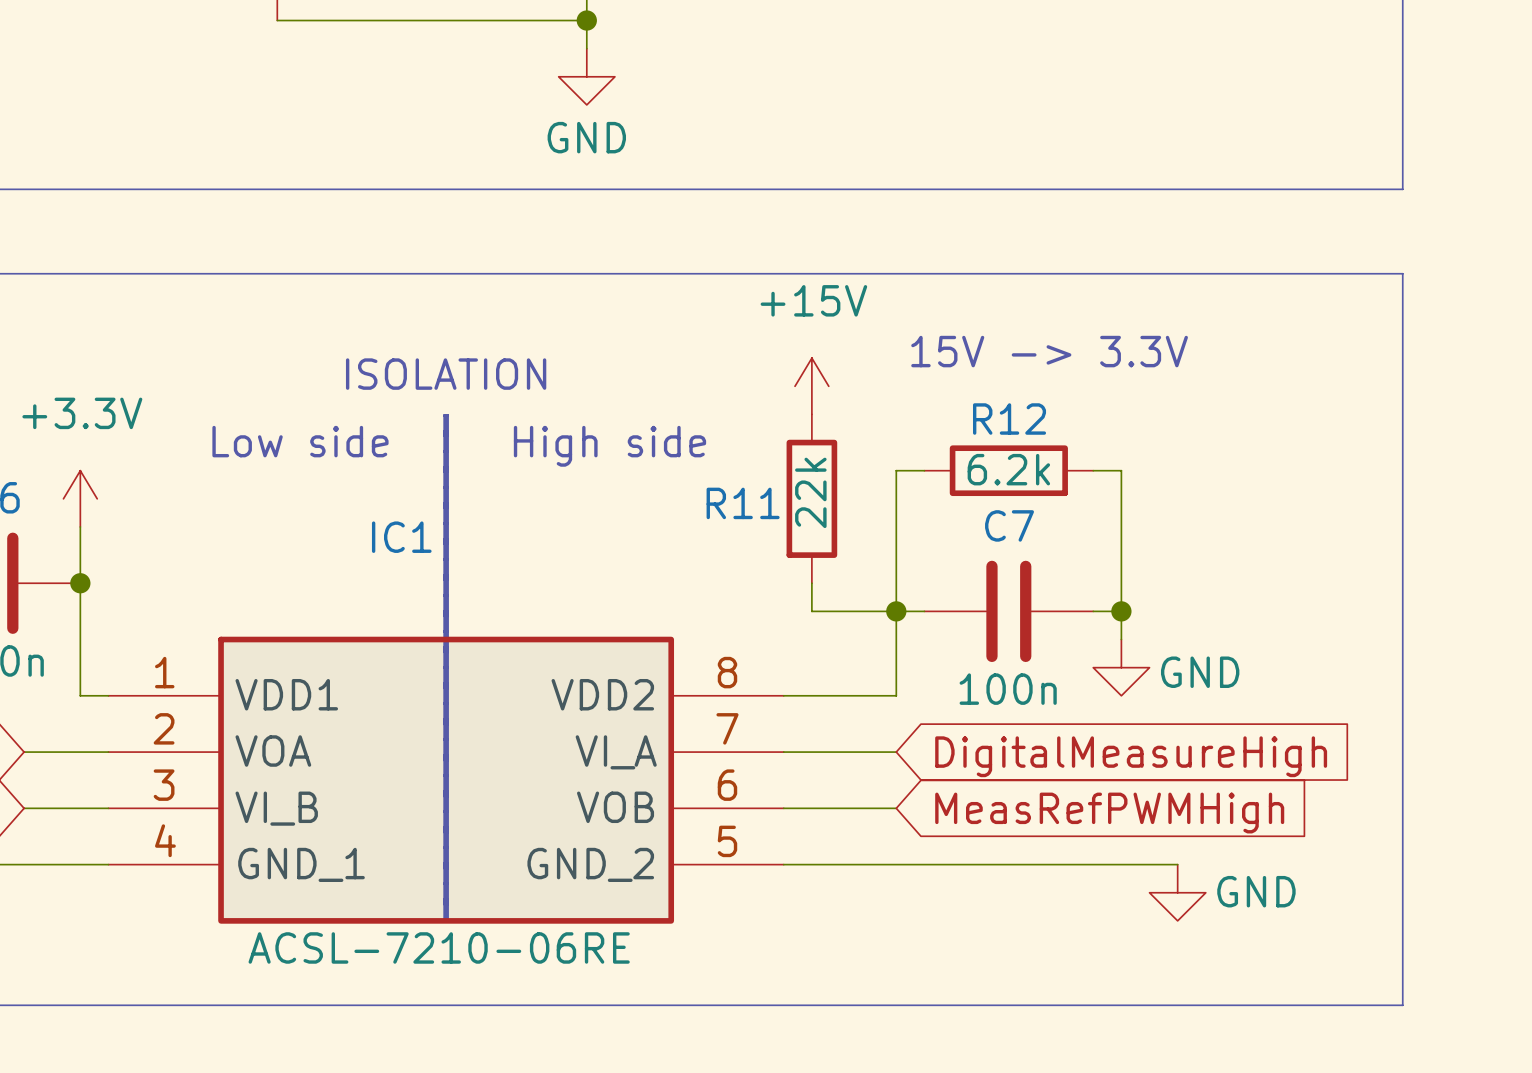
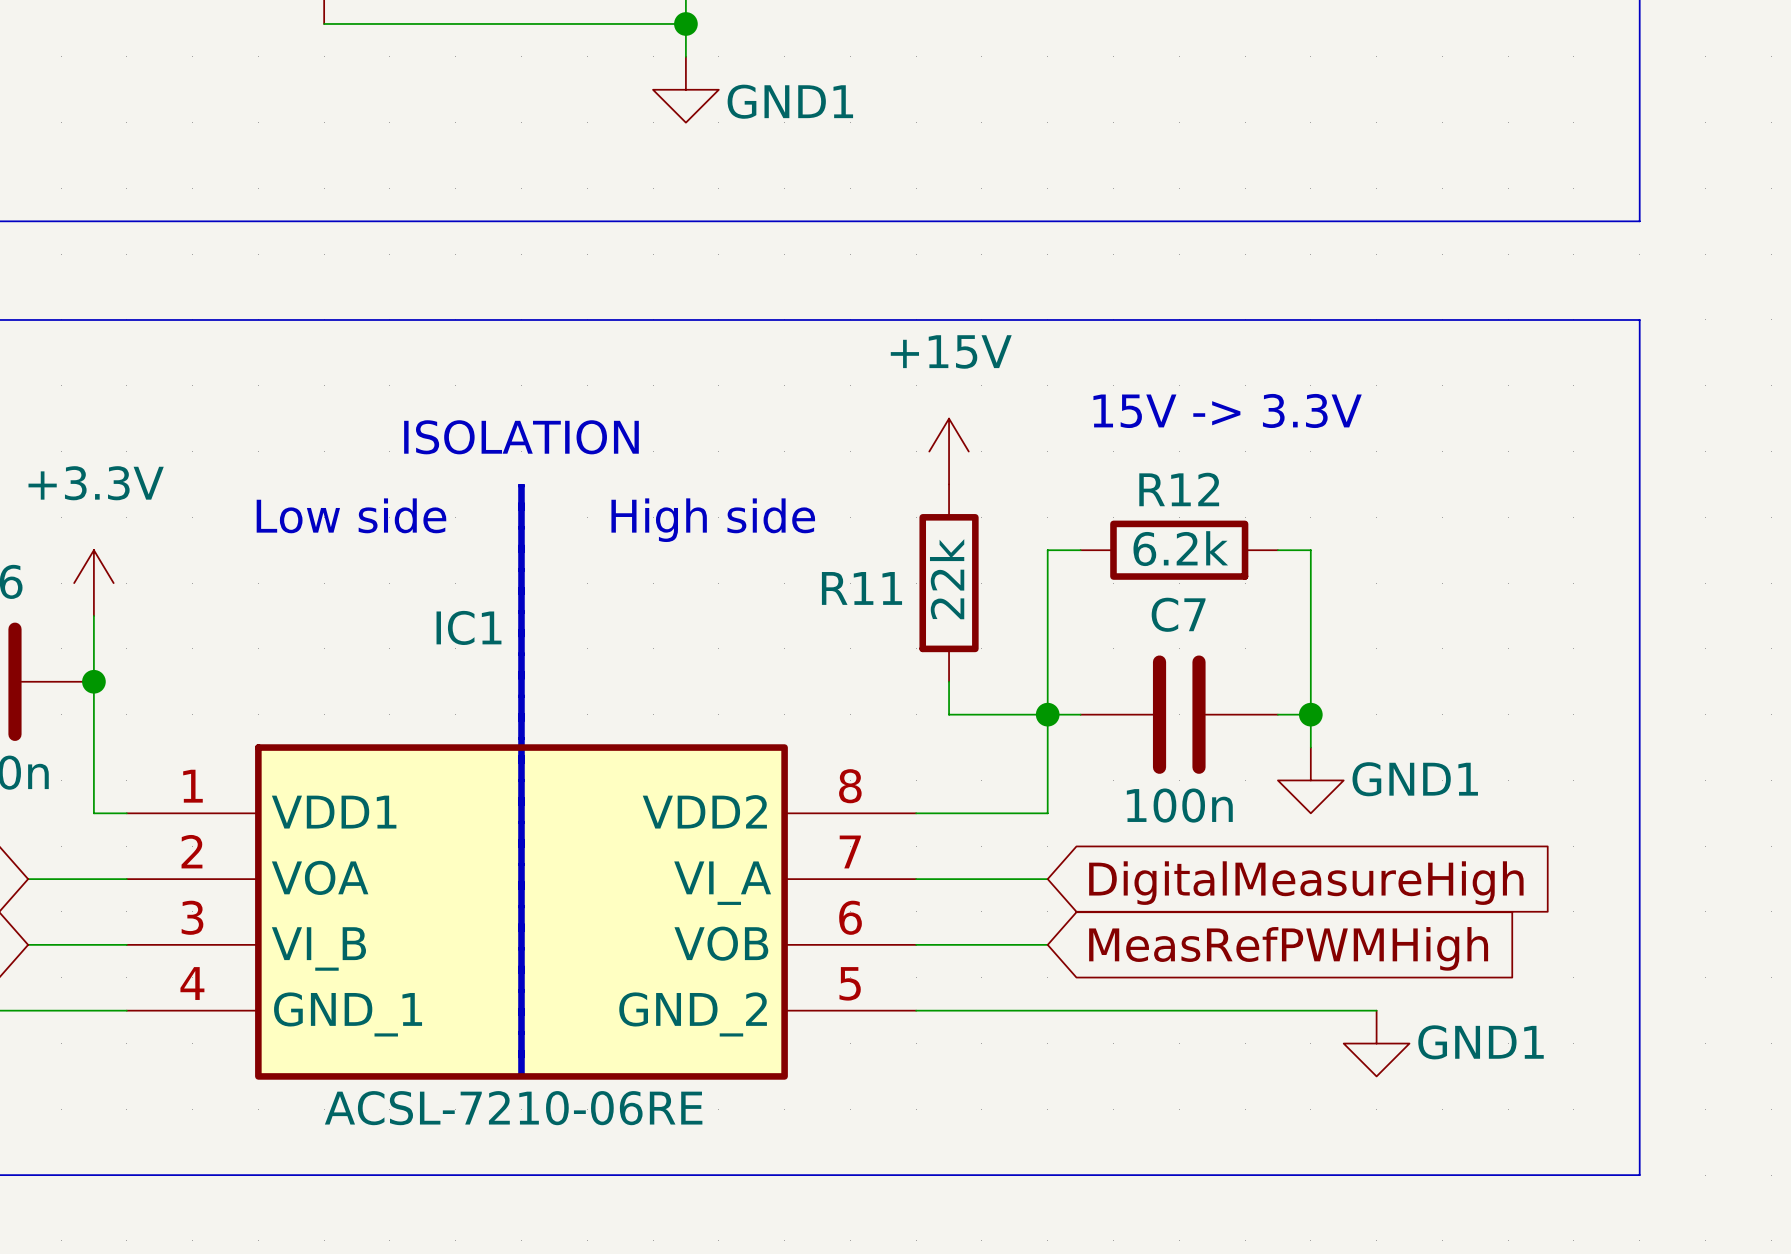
power symbol: GND (586, 76) -> GND1 (685, 89)
power symbol: GND (1121, 667) -> GND1 (1310, 780)
power symbol: GND (1177, 892) -> GND1 (1376, 1043)

